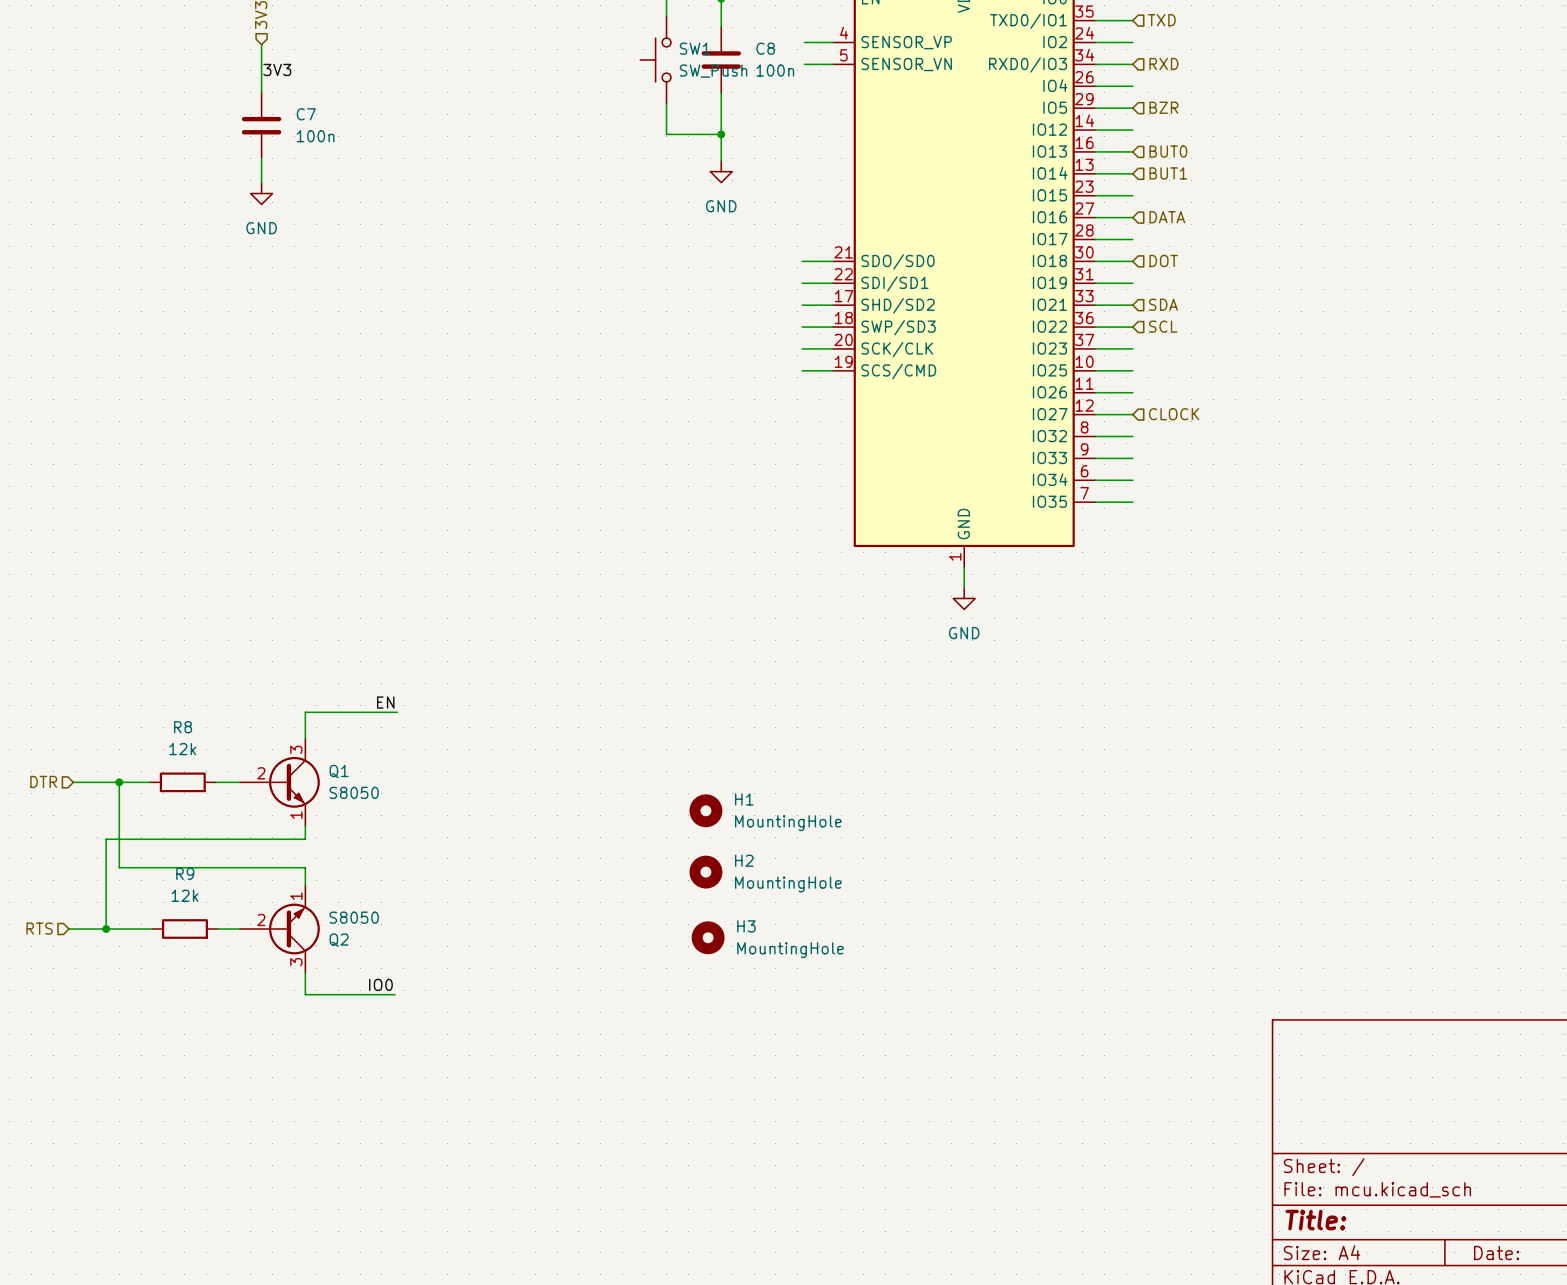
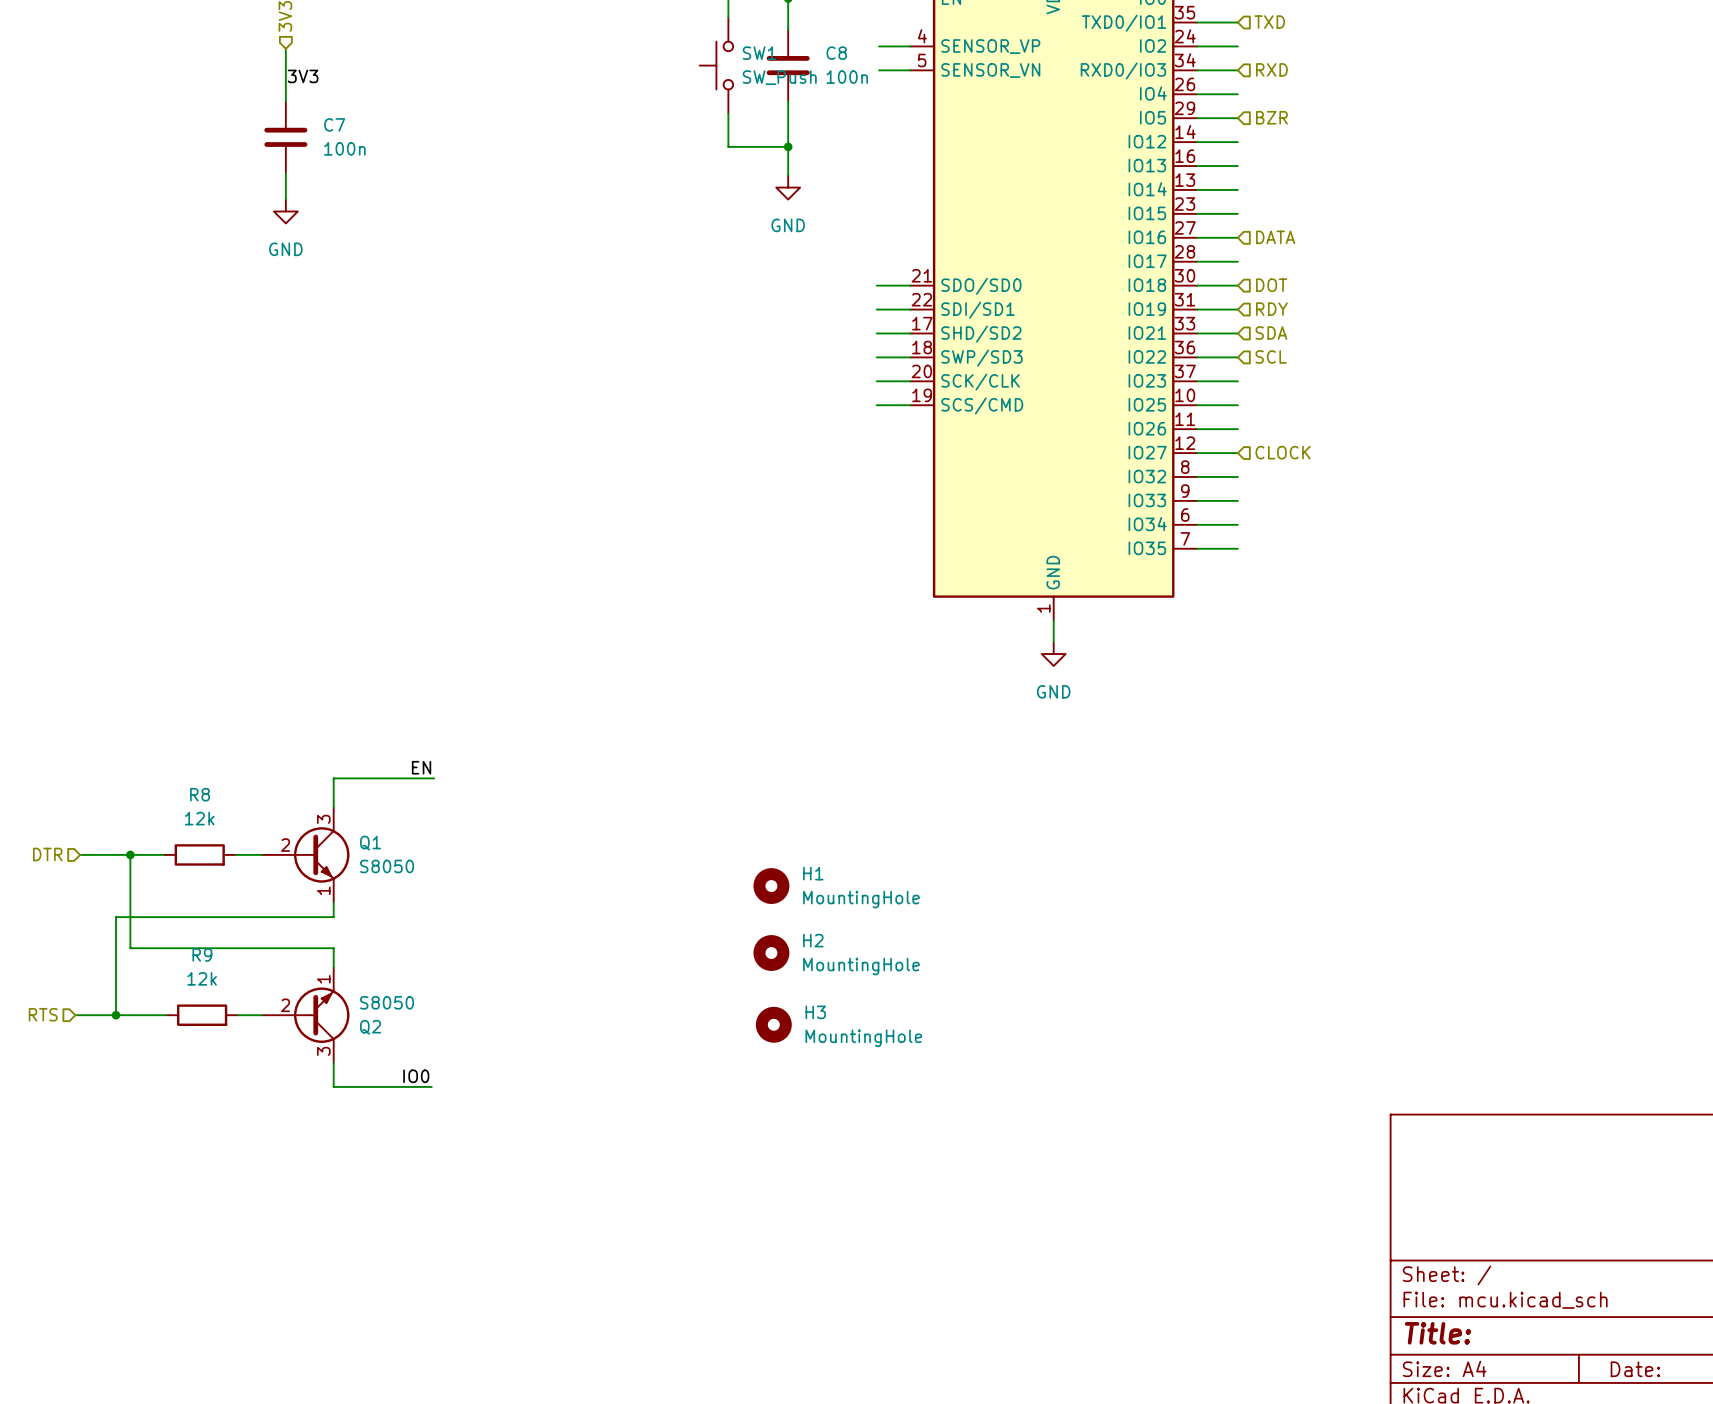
hierarchical label: BUT0 (1168, 151) -> none
hierarchical label: BUT1 (1168, 173) -> none
hierarchical label: none -> RDY (1271, 309)

